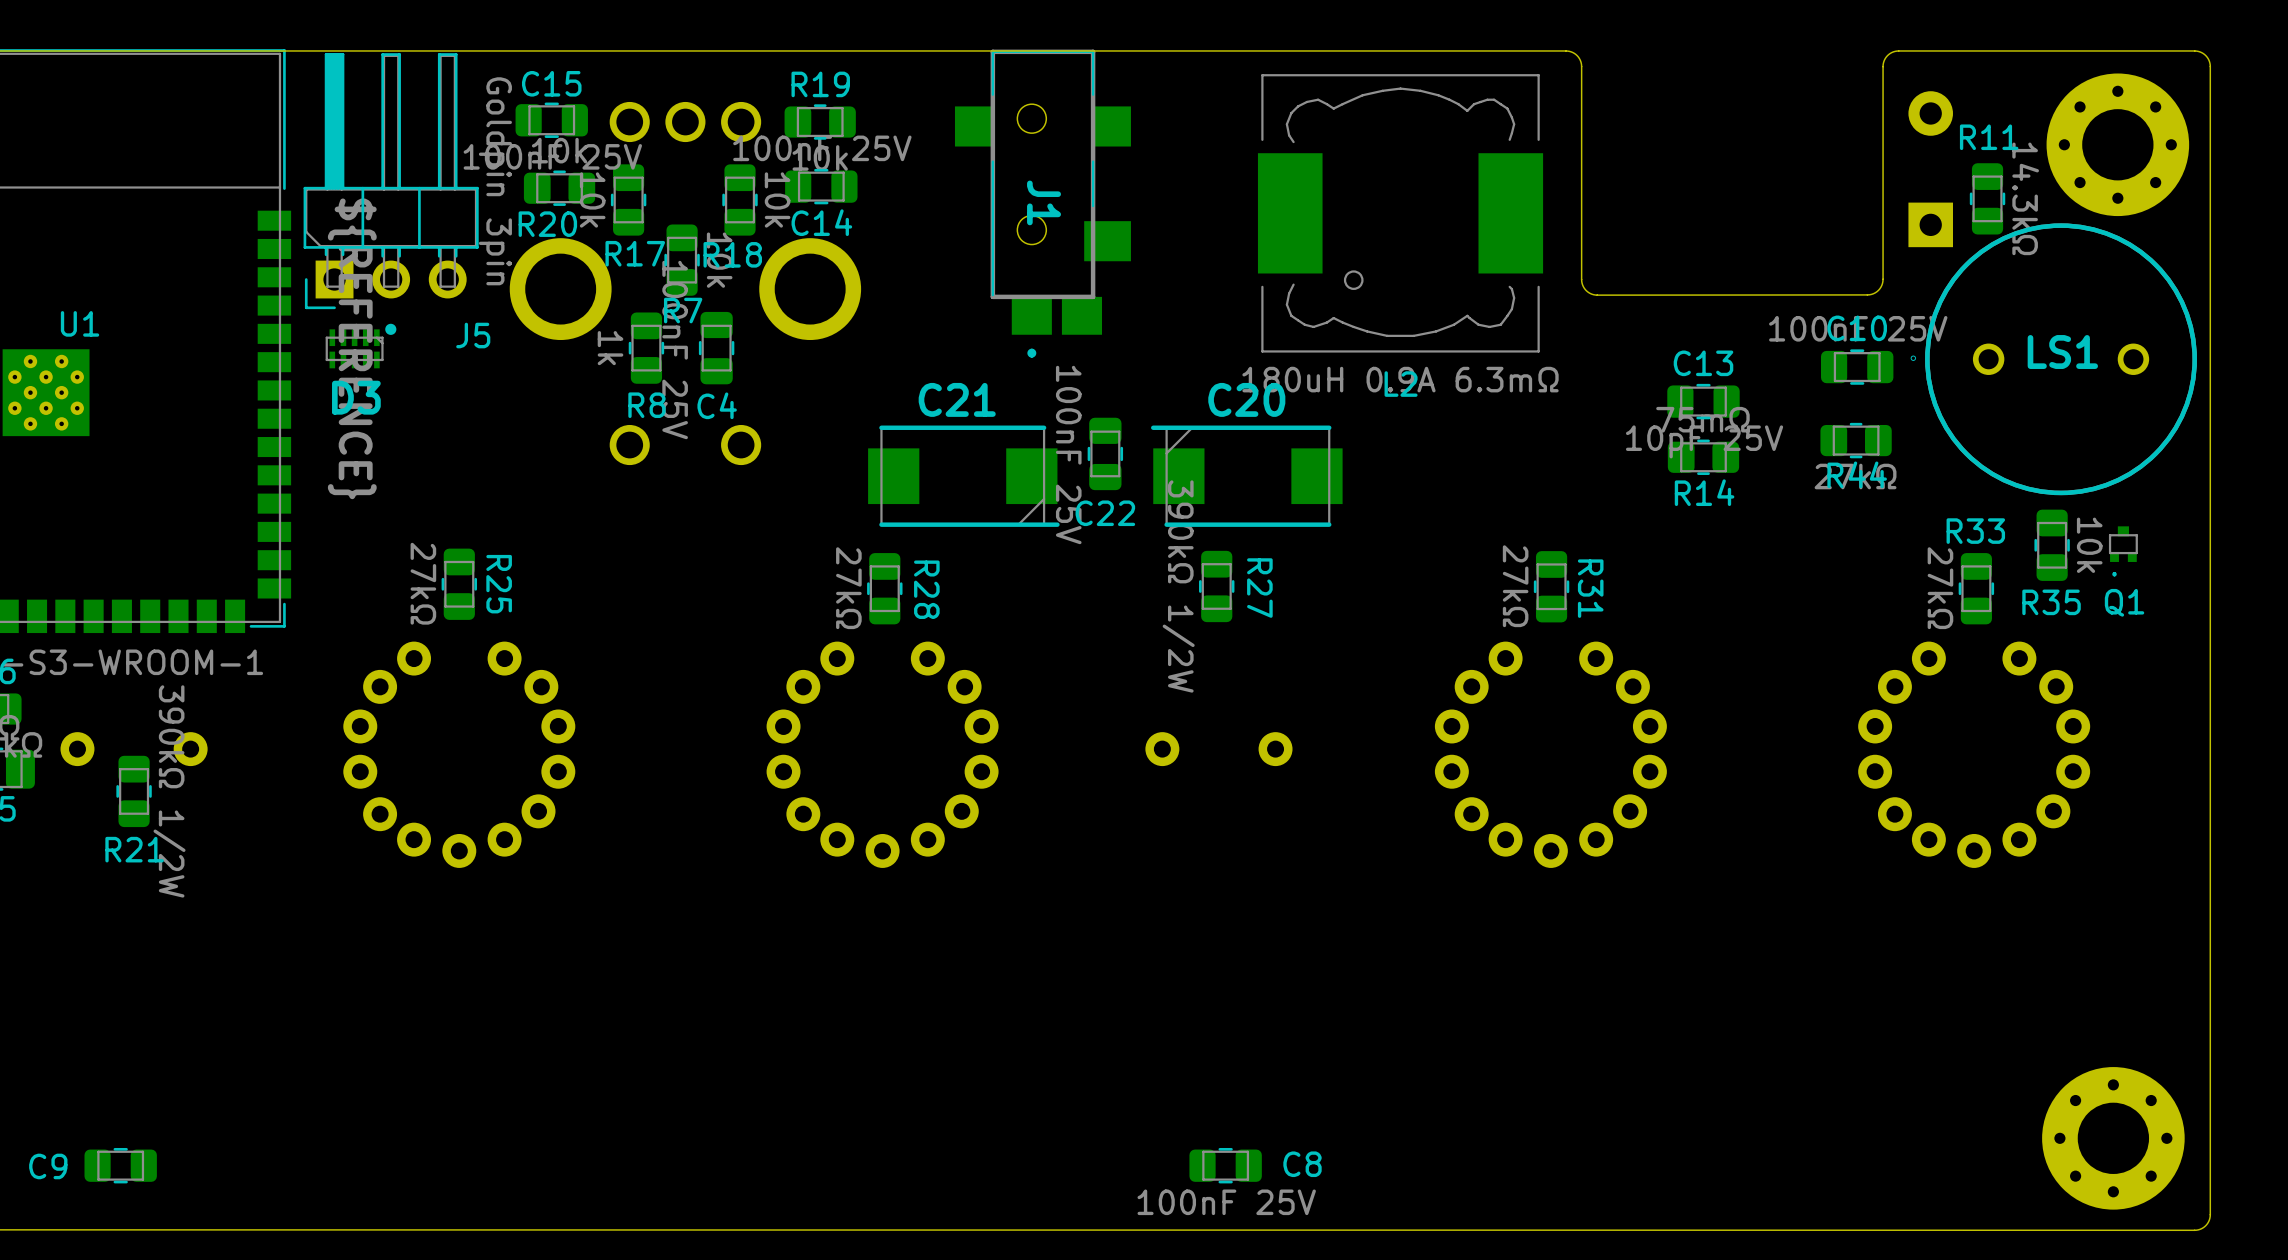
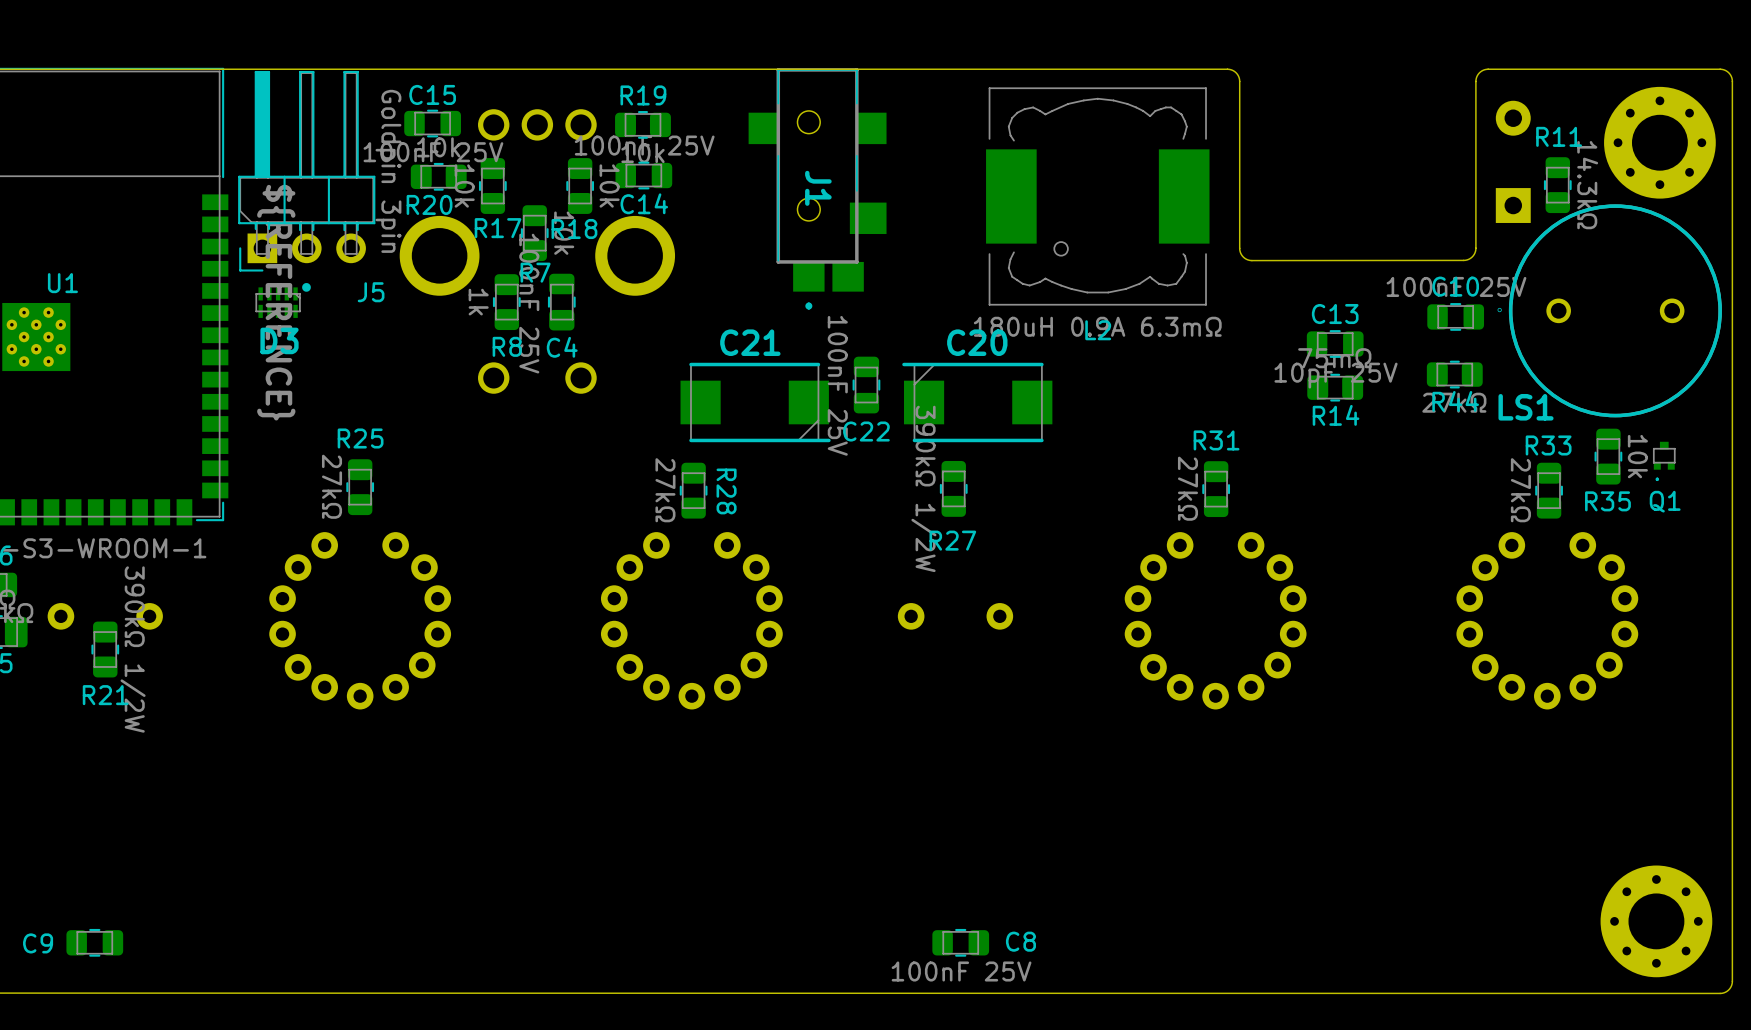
LS1 name position: LS1 (2062, 352) -> LS1 (1526, 407)
R25 name rotation: 0° (499, 584) -> 90° counterclockwise (360, 438)
R27 name rotation: 0° (1259, 588) -> 90° counterclockwise (952, 540)
R27 name position: R27 (1259, 588) -> R27 (952, 540)
R31 name rotation: 0° (1590, 588) -> 90° counterclockwise (1216, 440)

